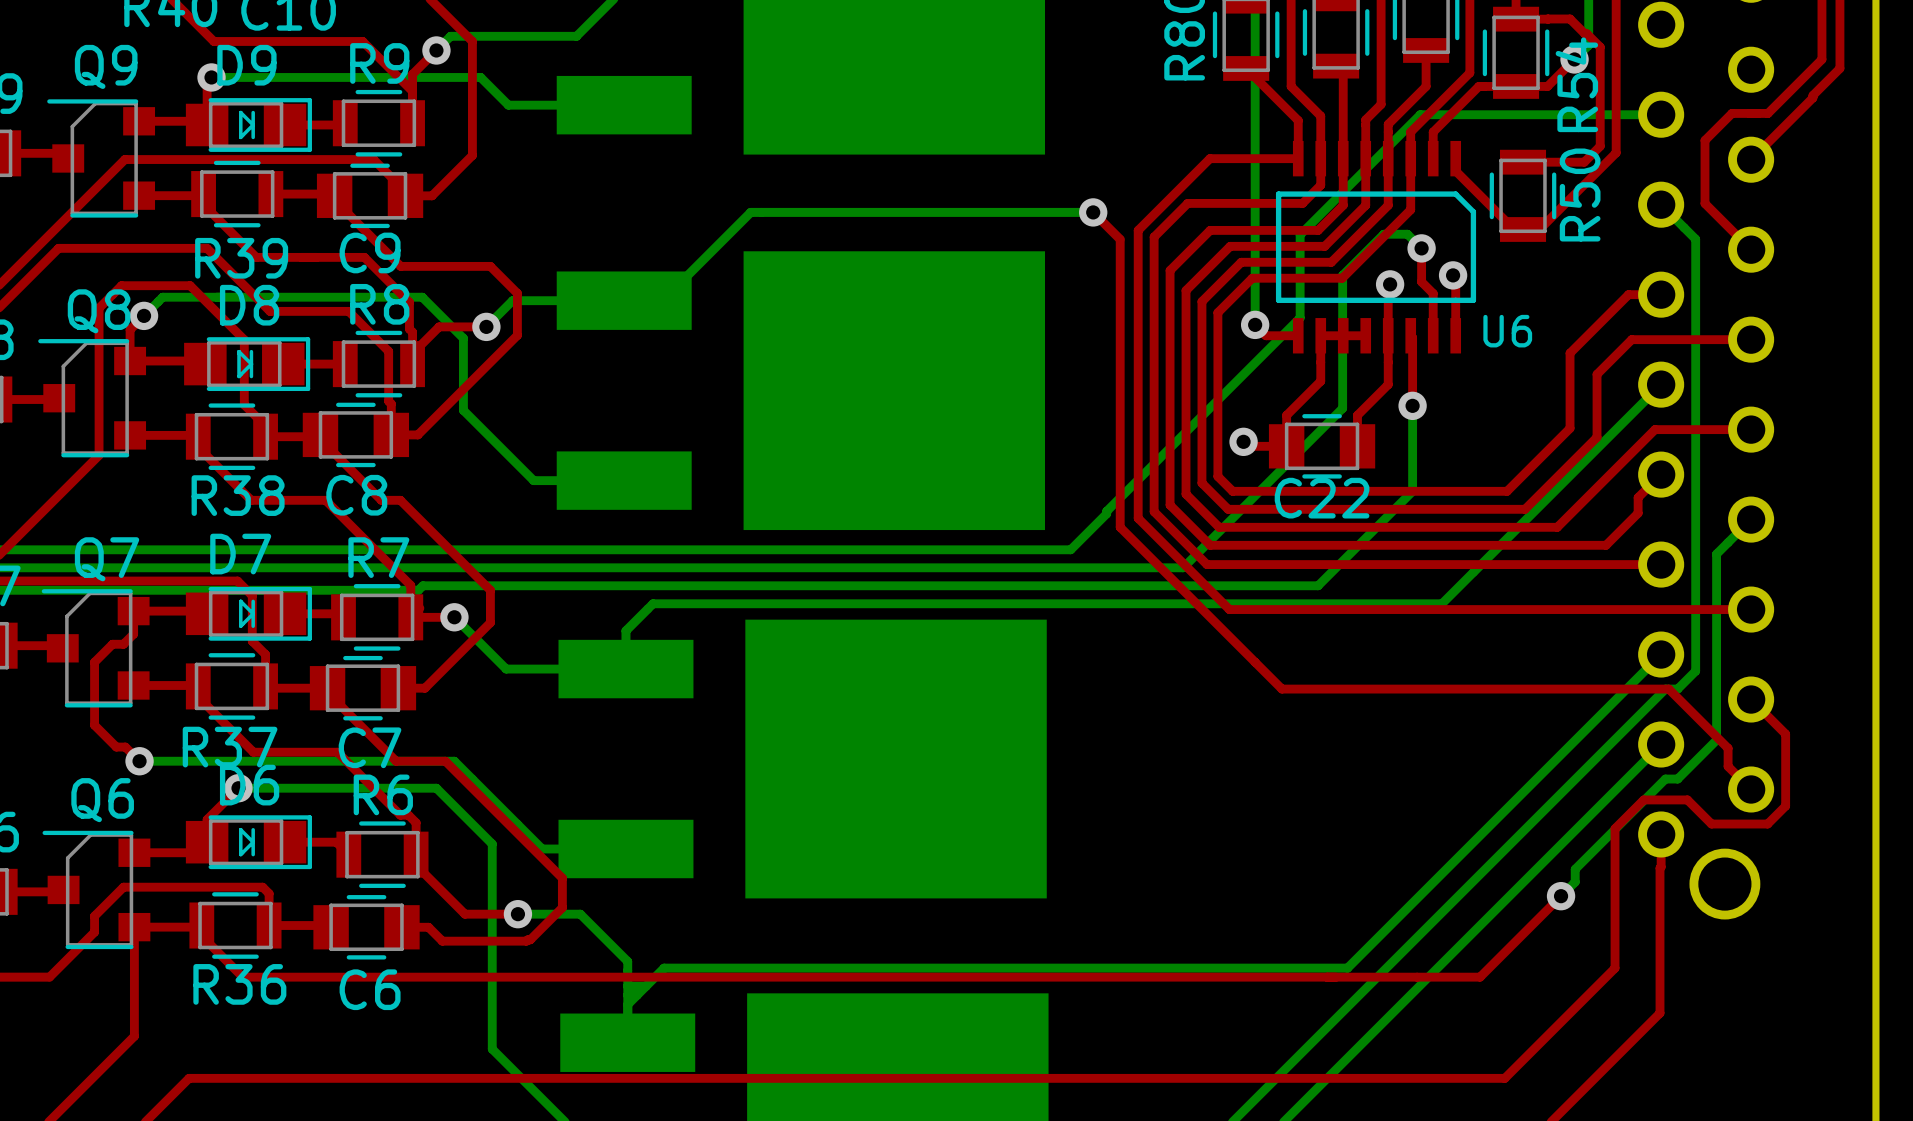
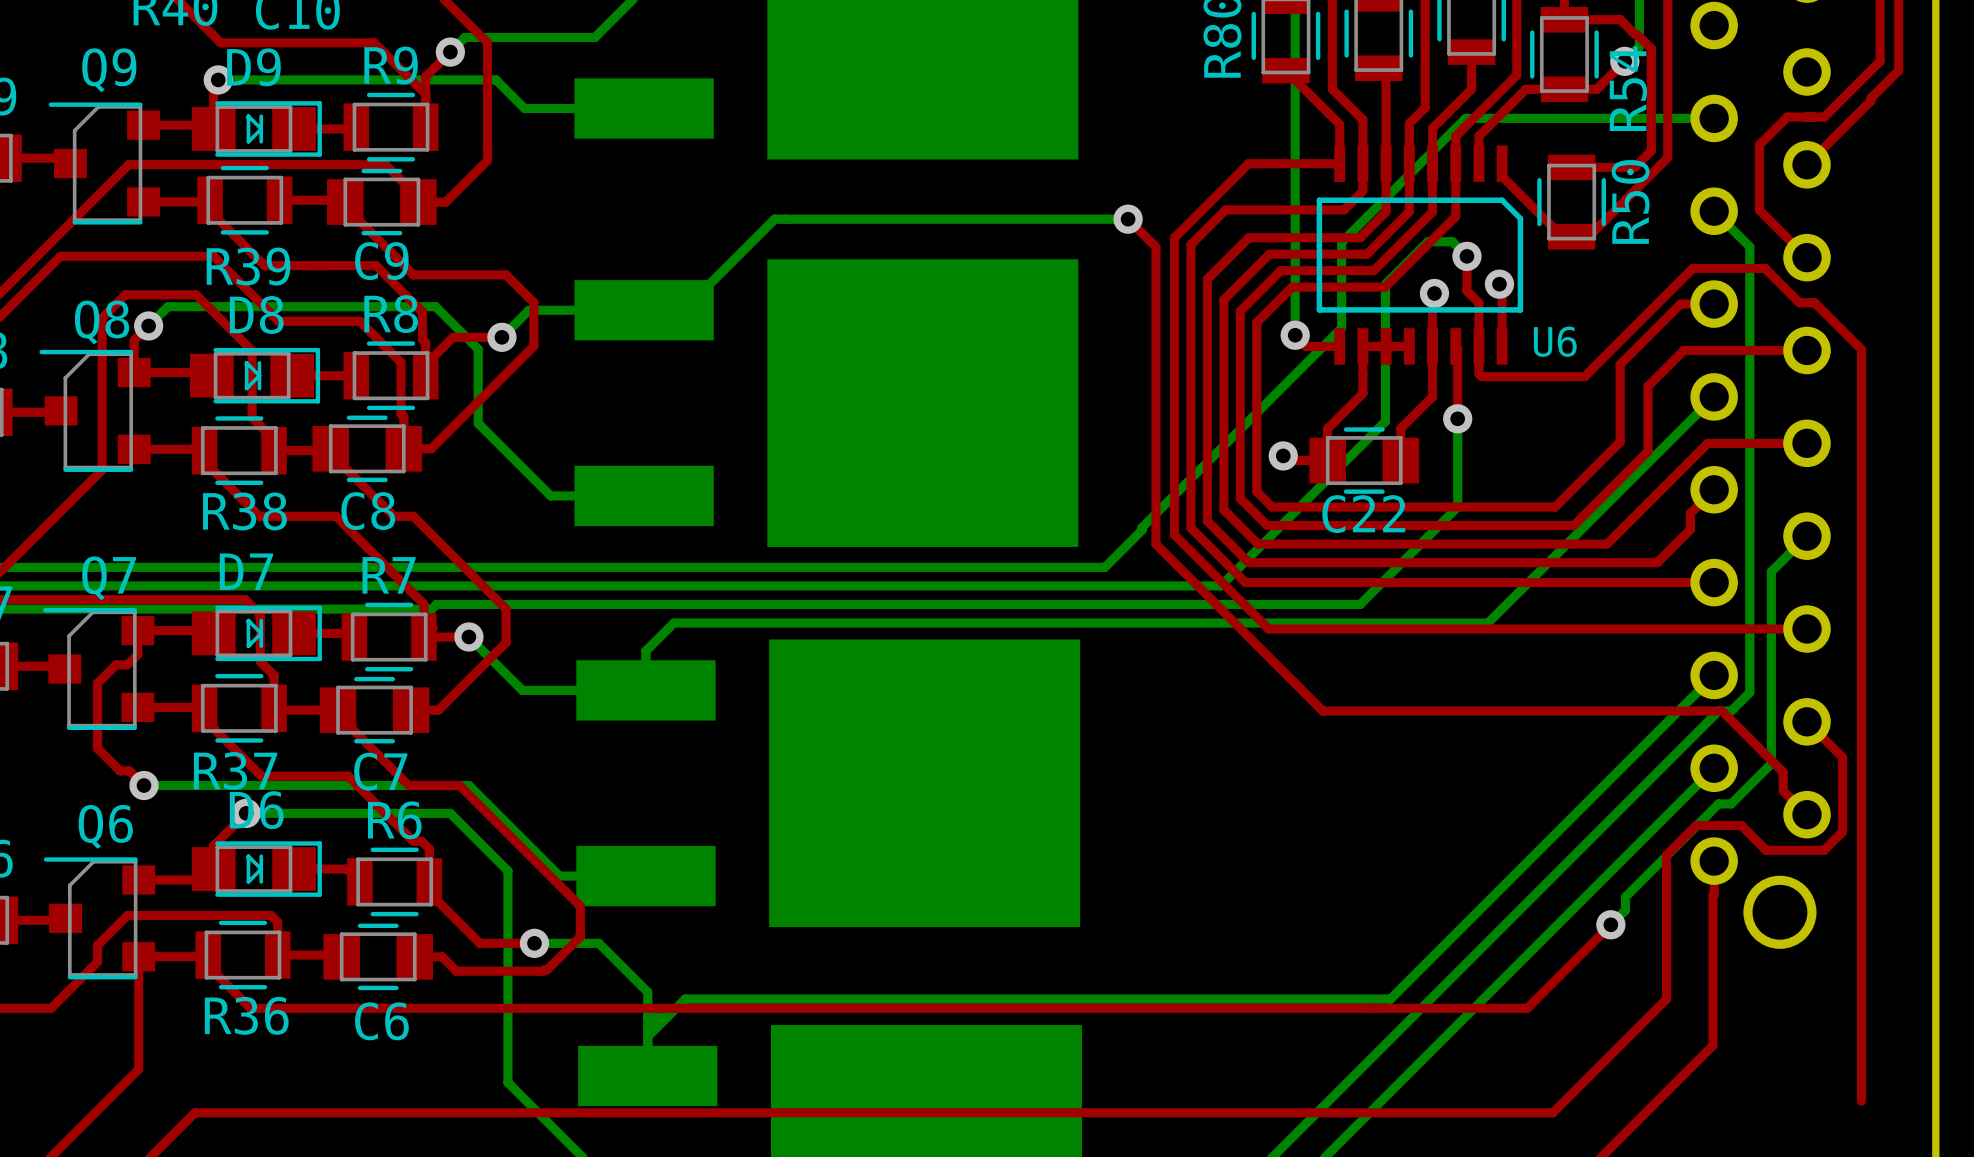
top track: none -> (1478, 346) (1478, 373) (1481, 376) (1584, 376) (1692, 268) (1765, 268) (1799, 302) (1814, 302) (1861, 349) (1861, 1101)

